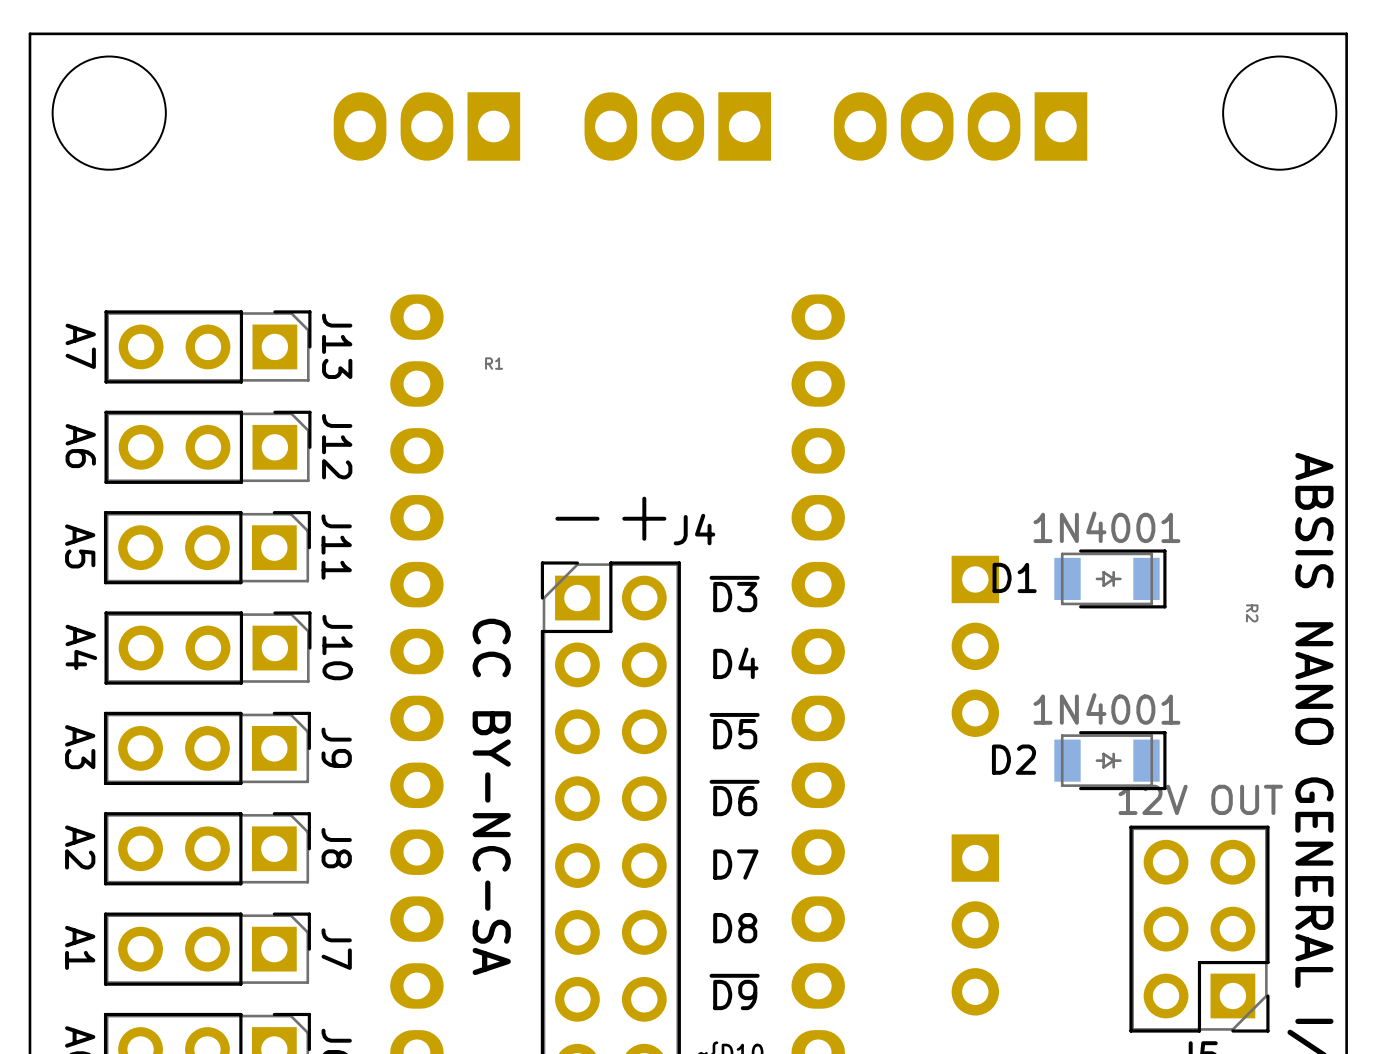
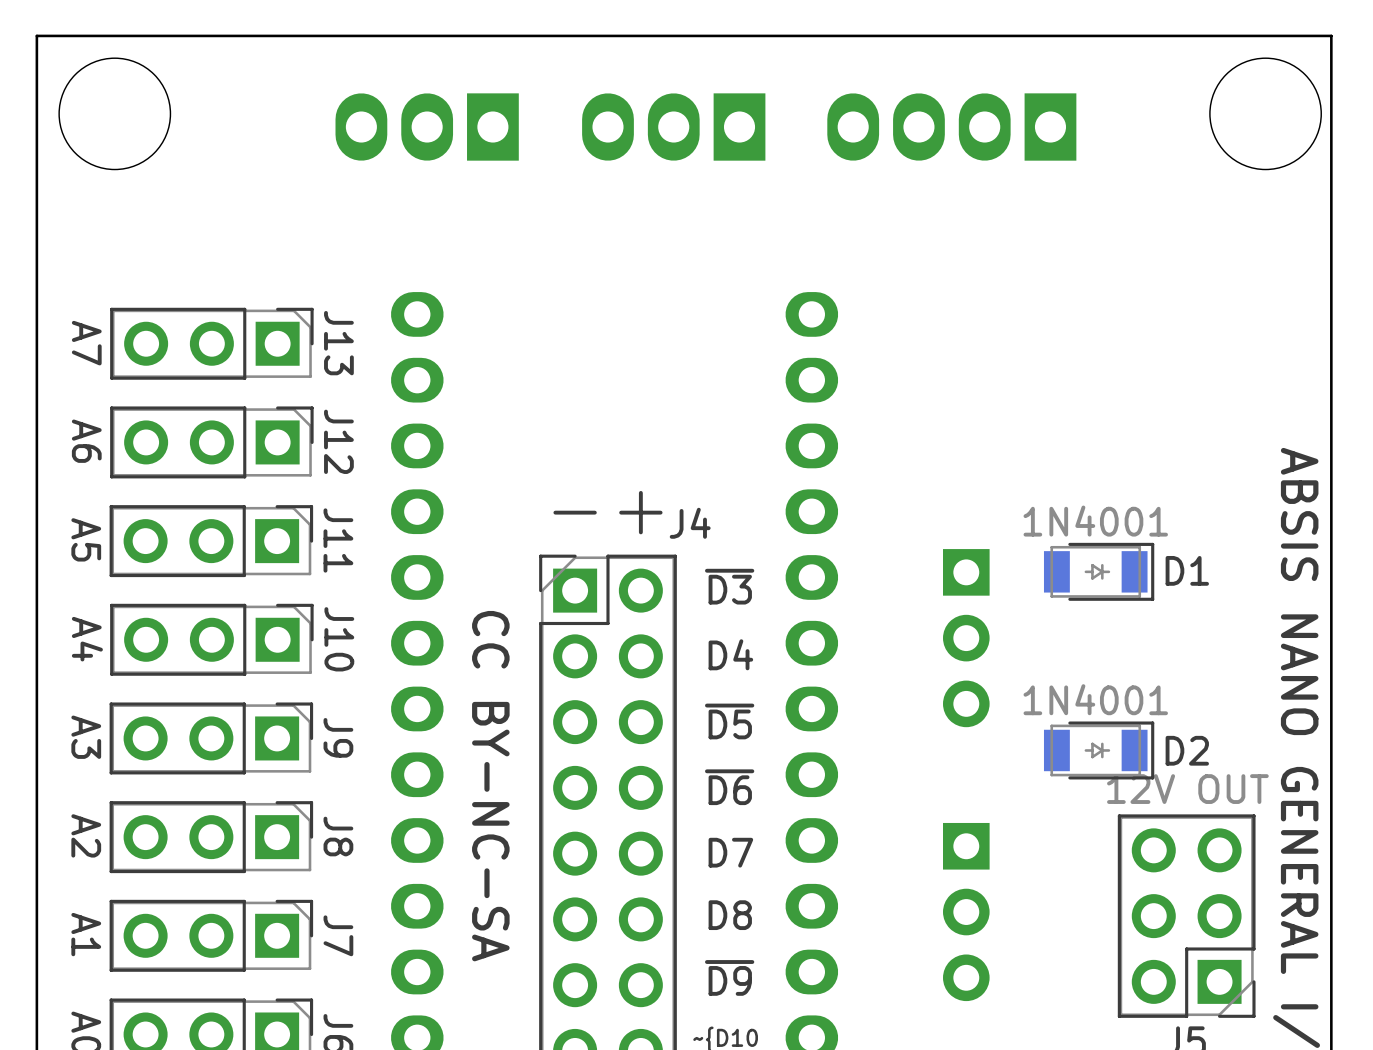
R1: (494, 363) -> none
D1 name position: D1 (1014, 577) -> D1 (1187, 570)
R2: (1252, 613) -> none
D2 name position: D2 (1013, 759) -> D2 (1187, 750)

